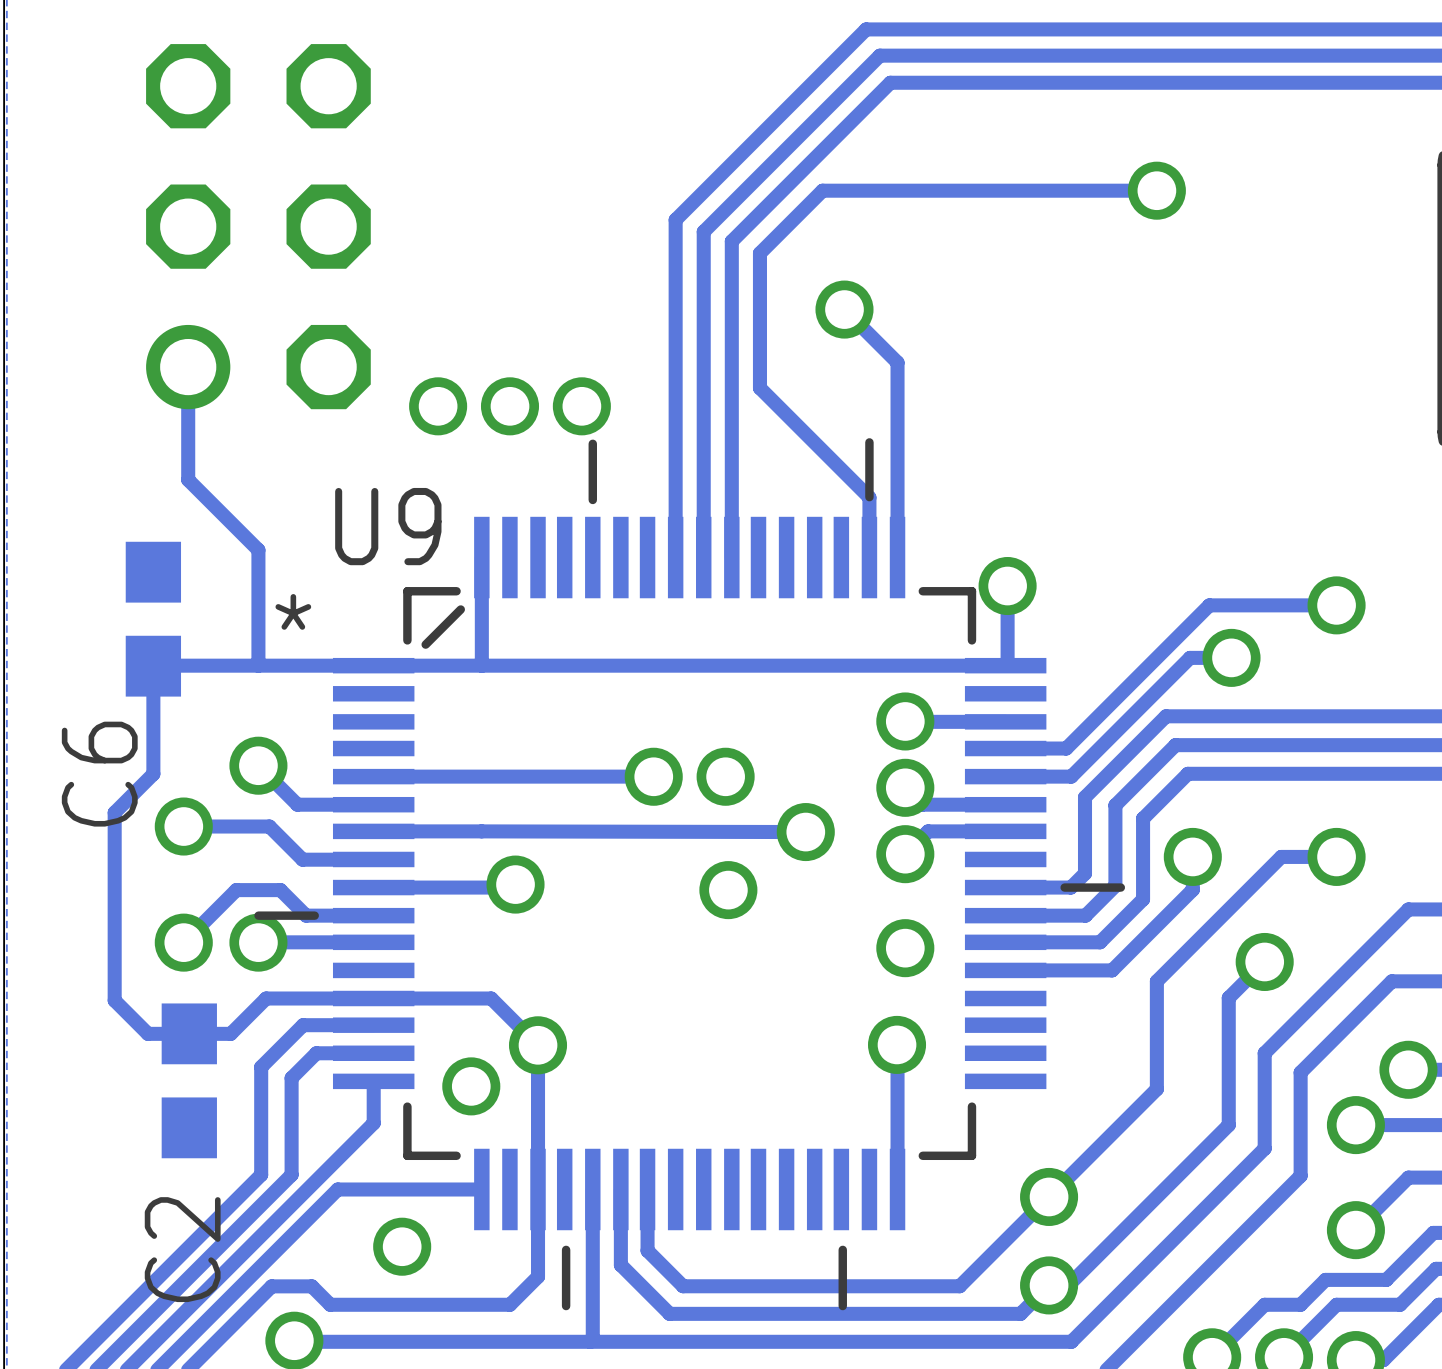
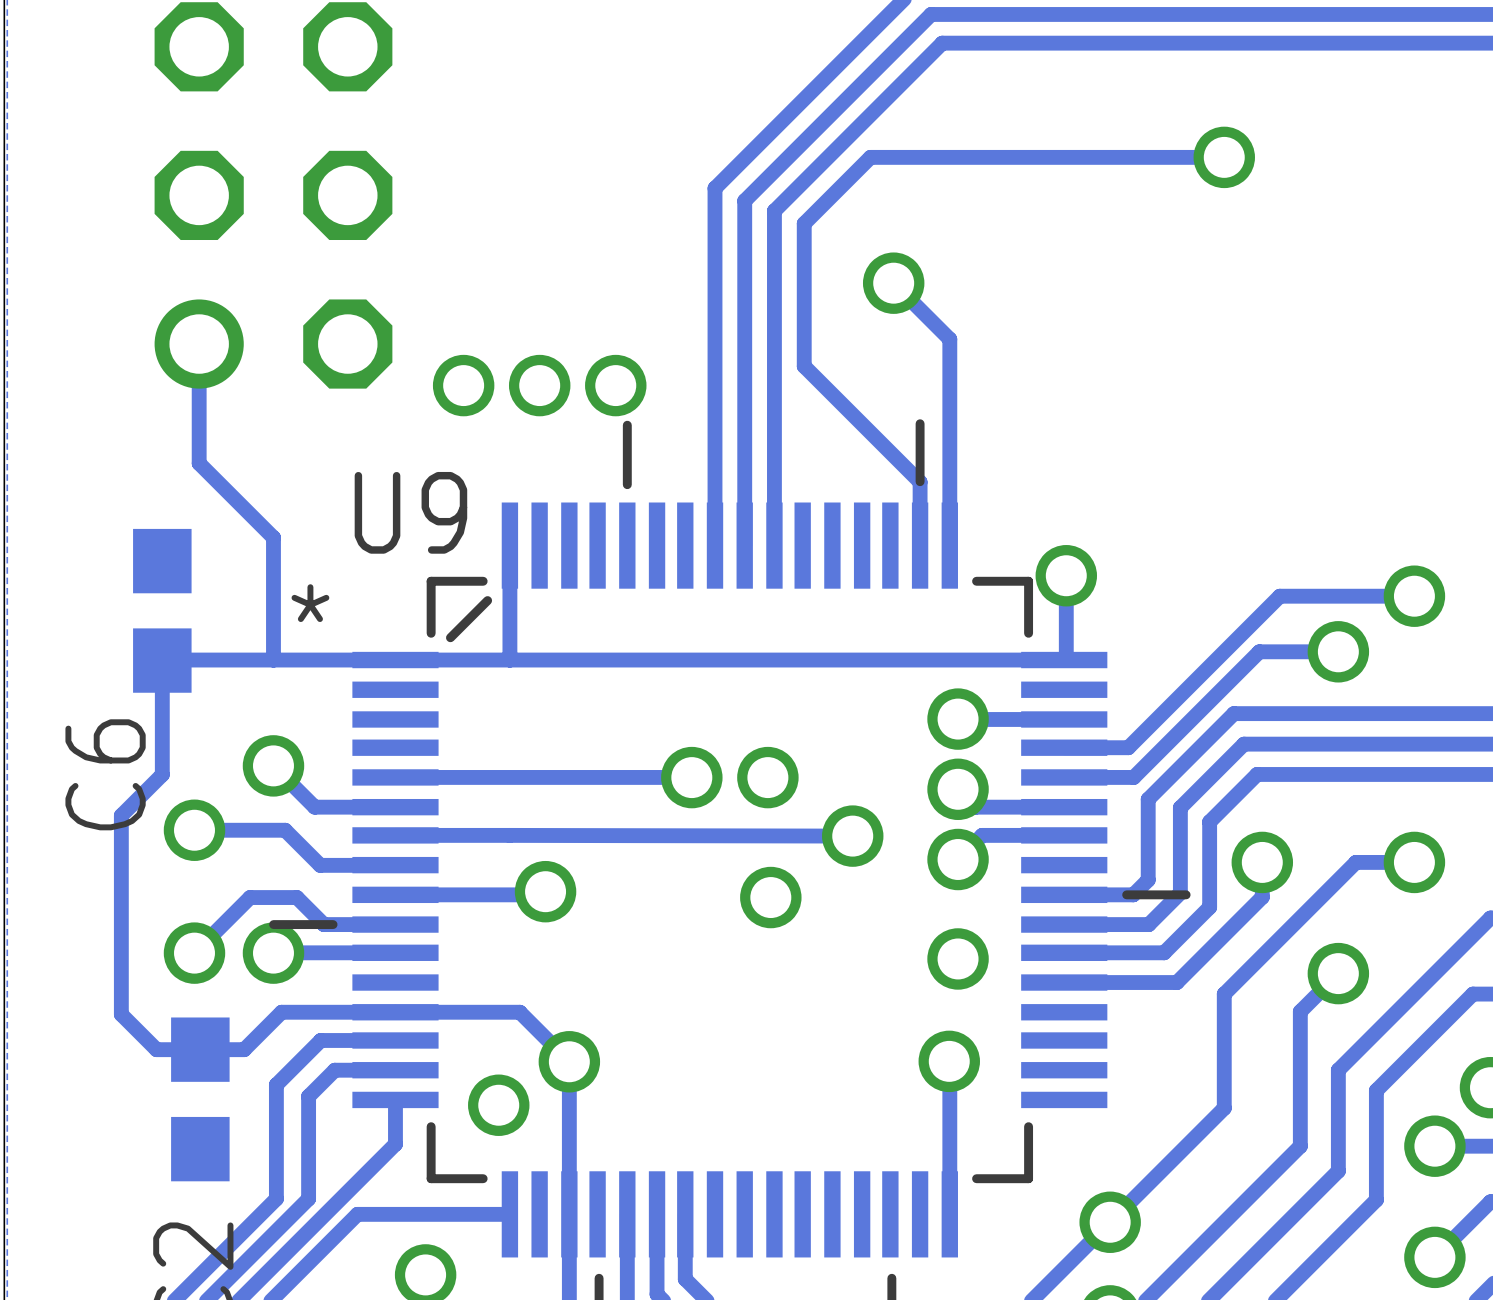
via position: (1231, 657) -> (1338, 651)

